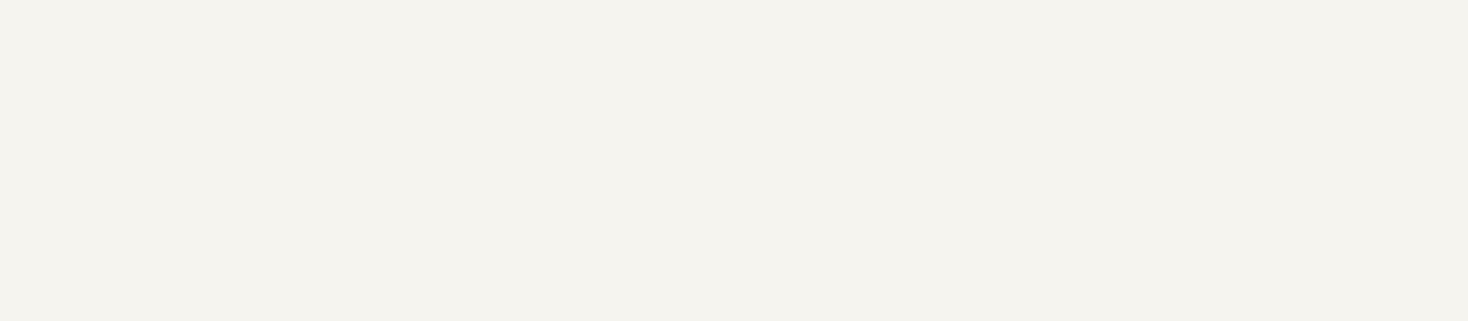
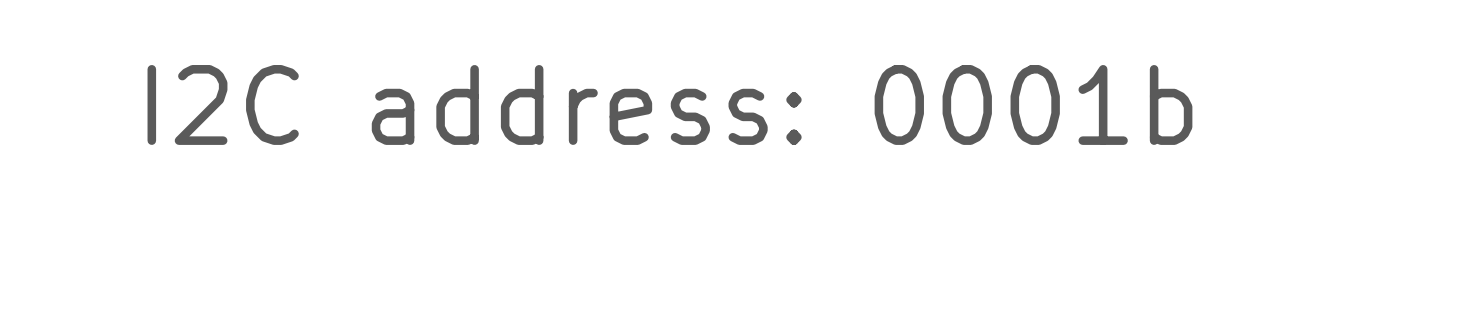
text: none -> I2C address: 0001b (669, 104)

